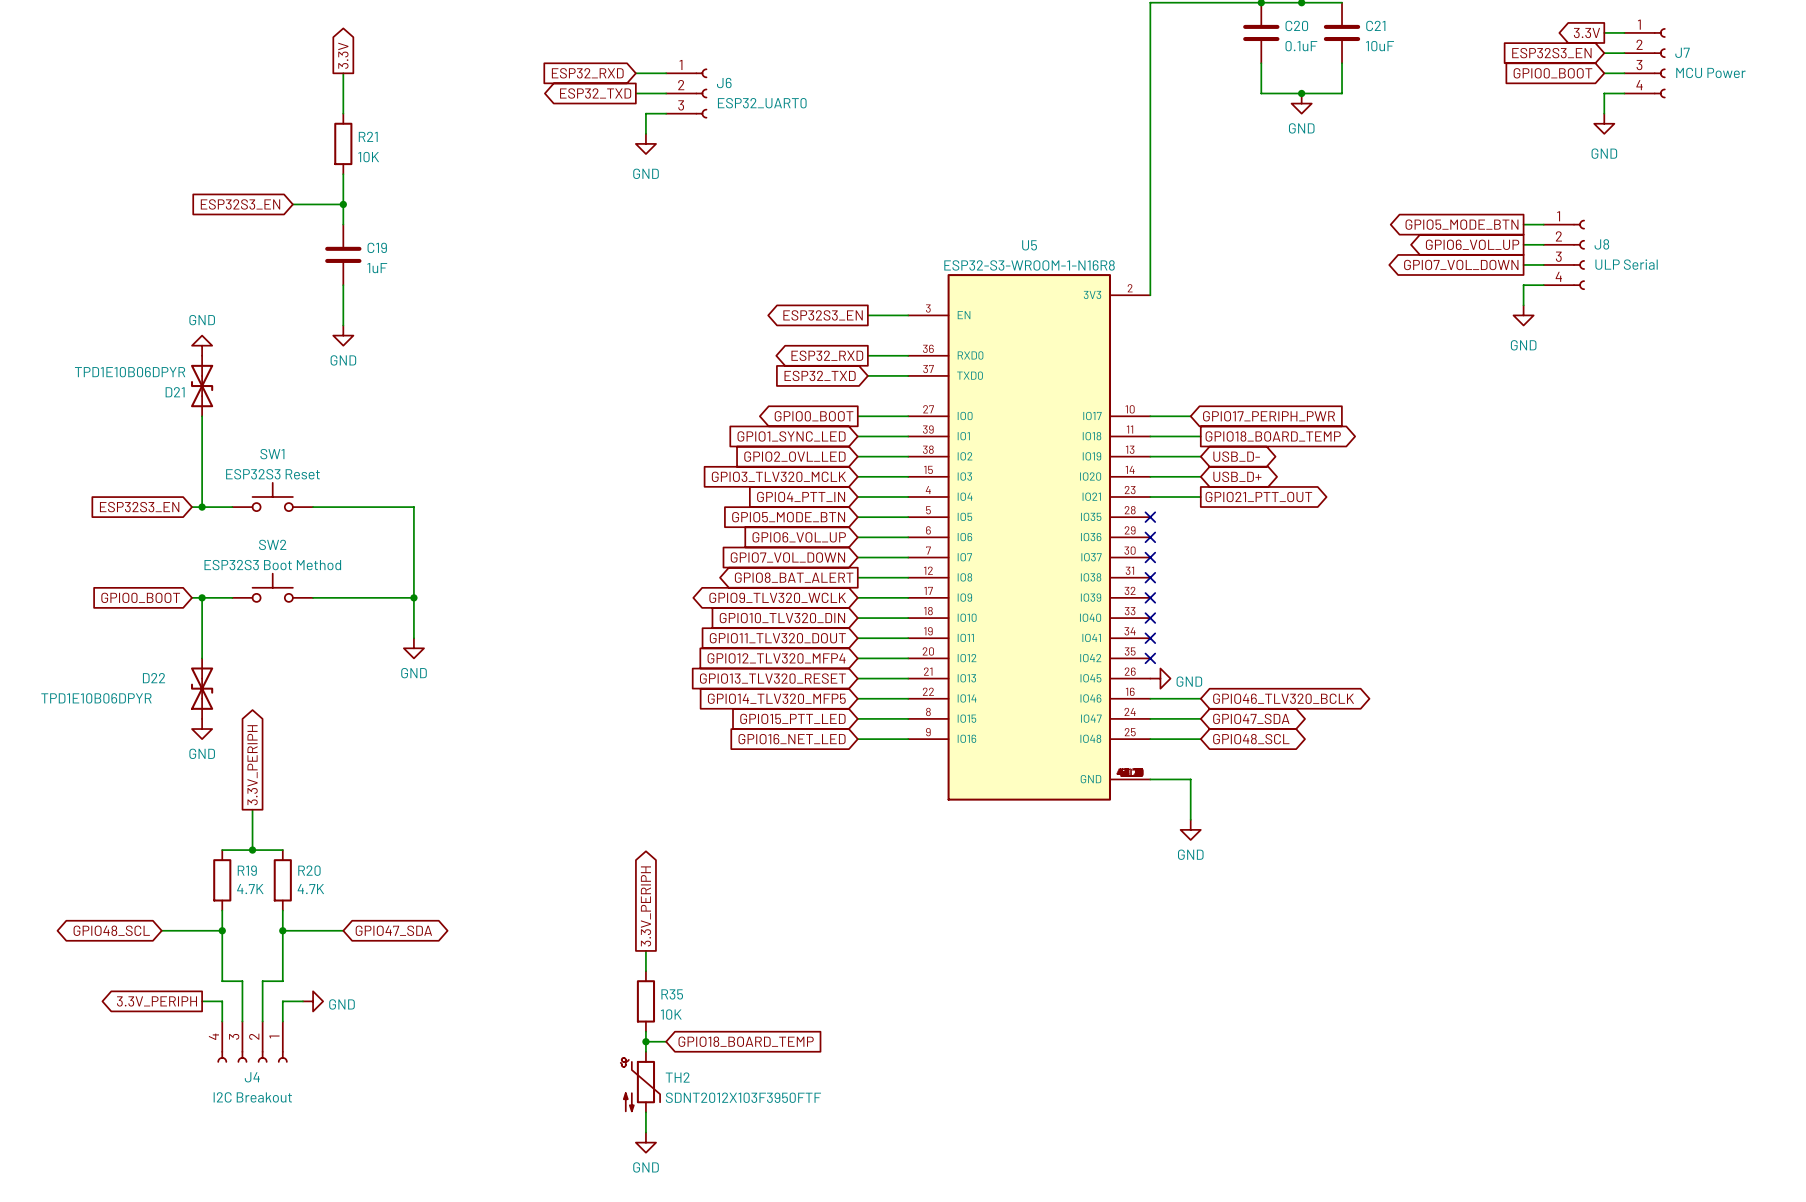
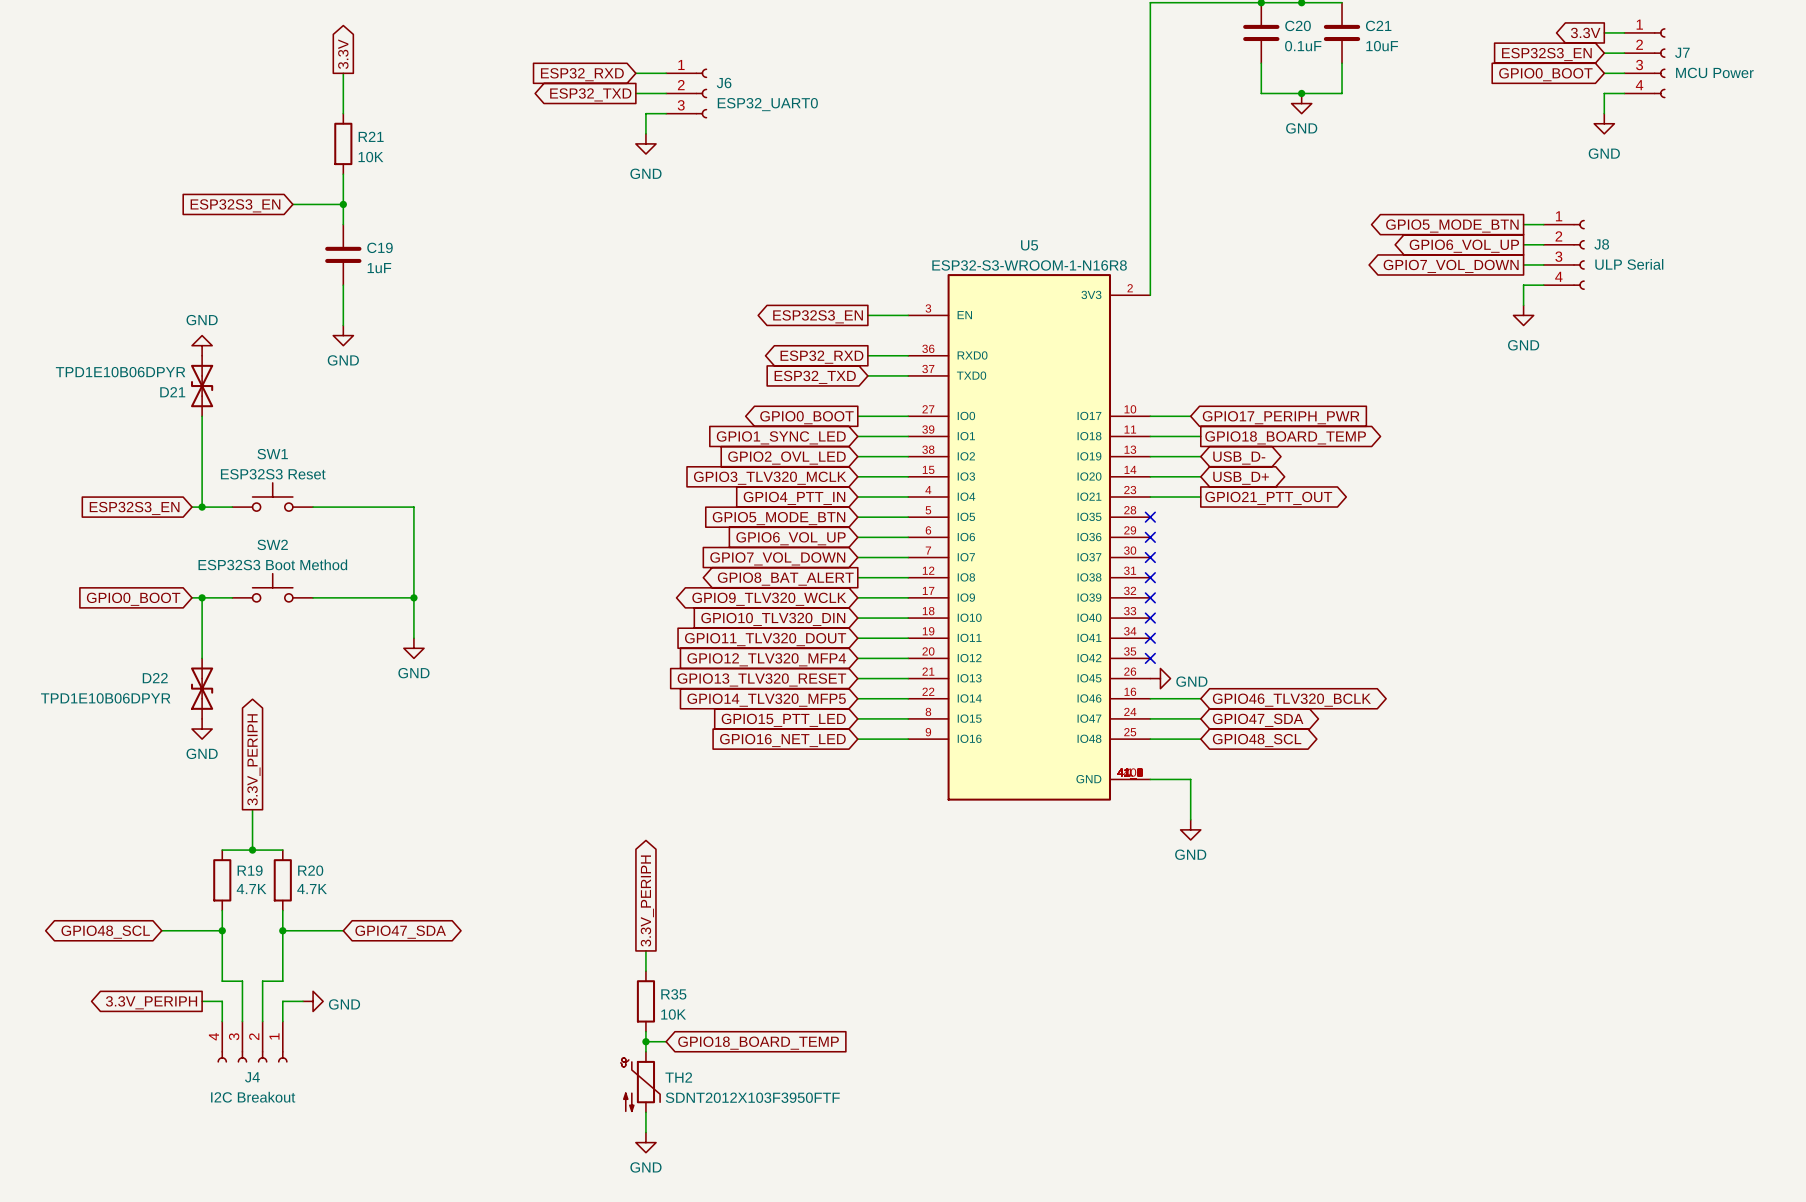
U5 symbol: [908, 274, 1151, 801] -> [908, 274, 1151, 801]

